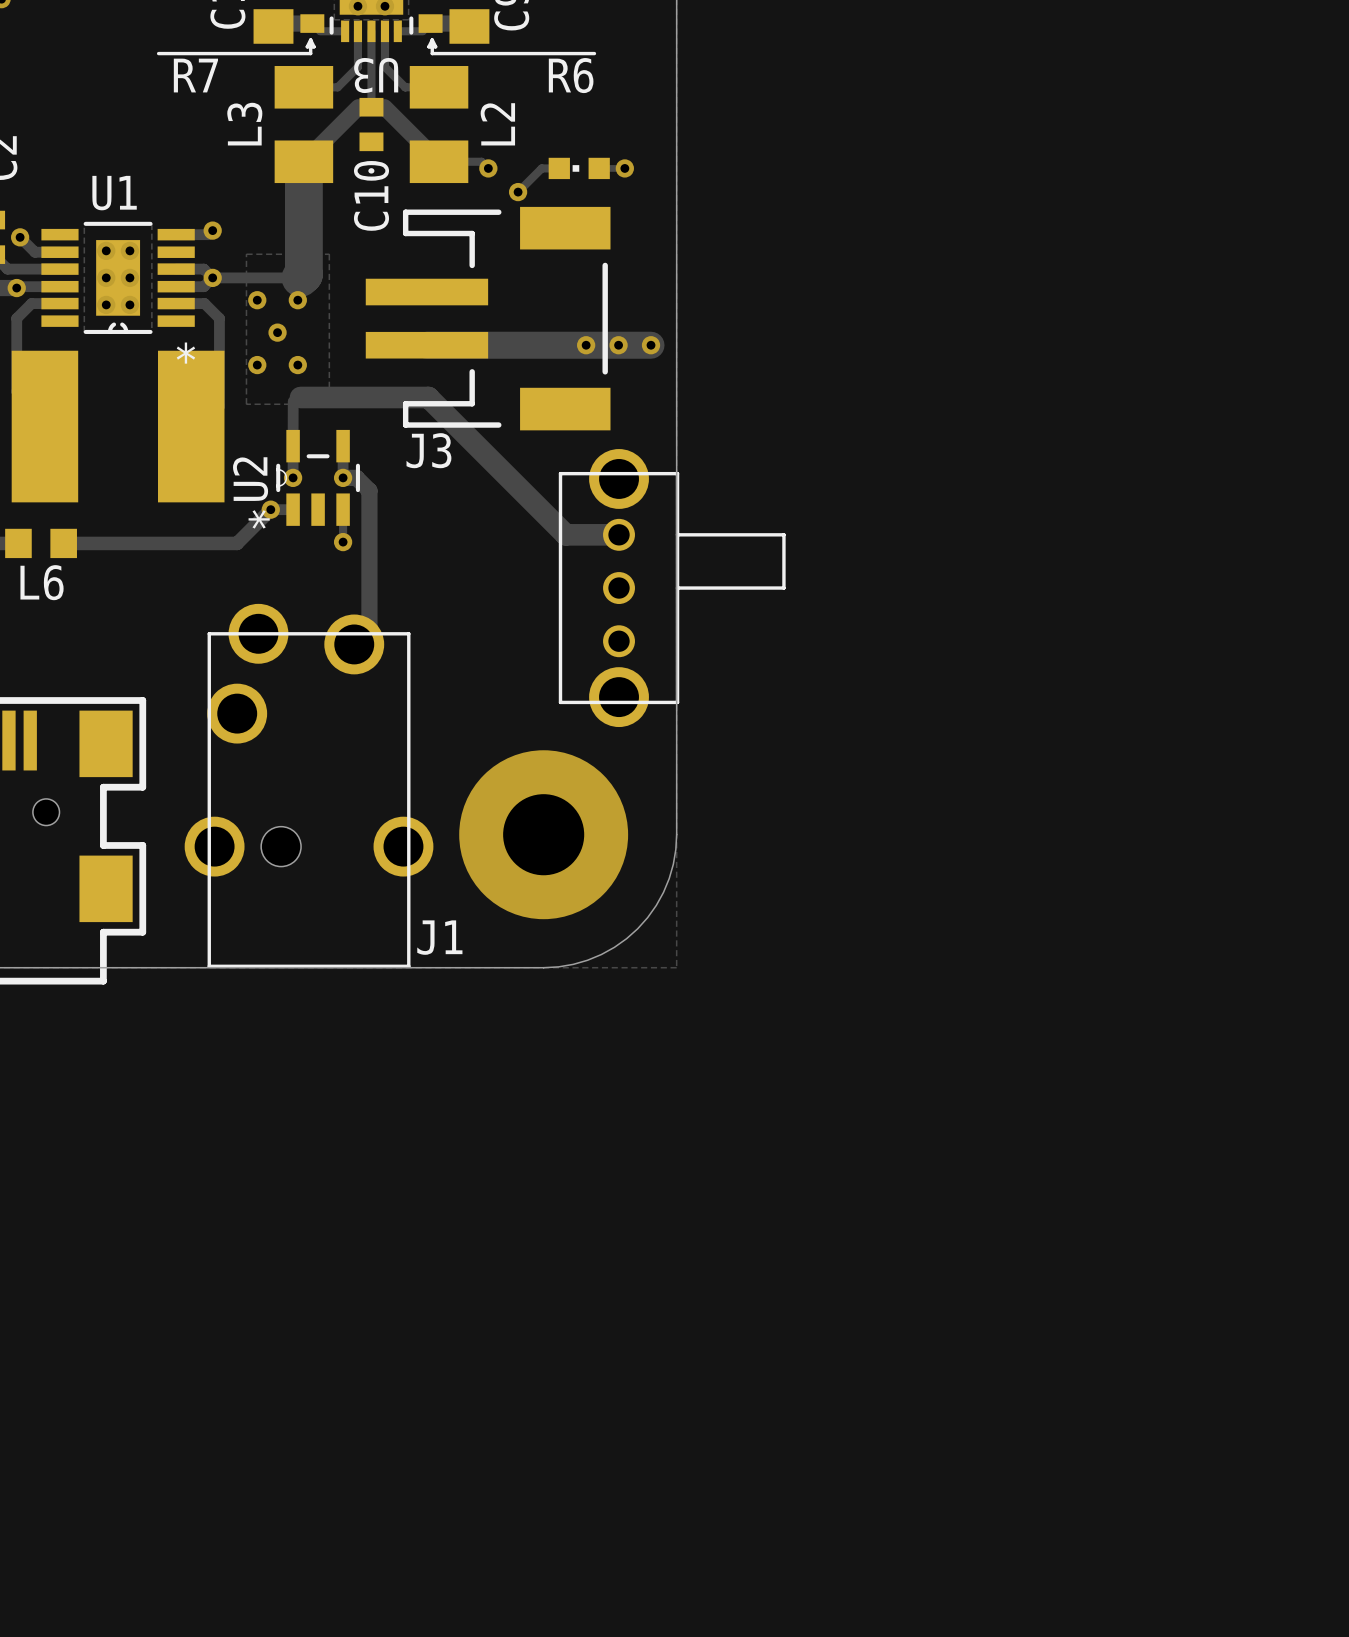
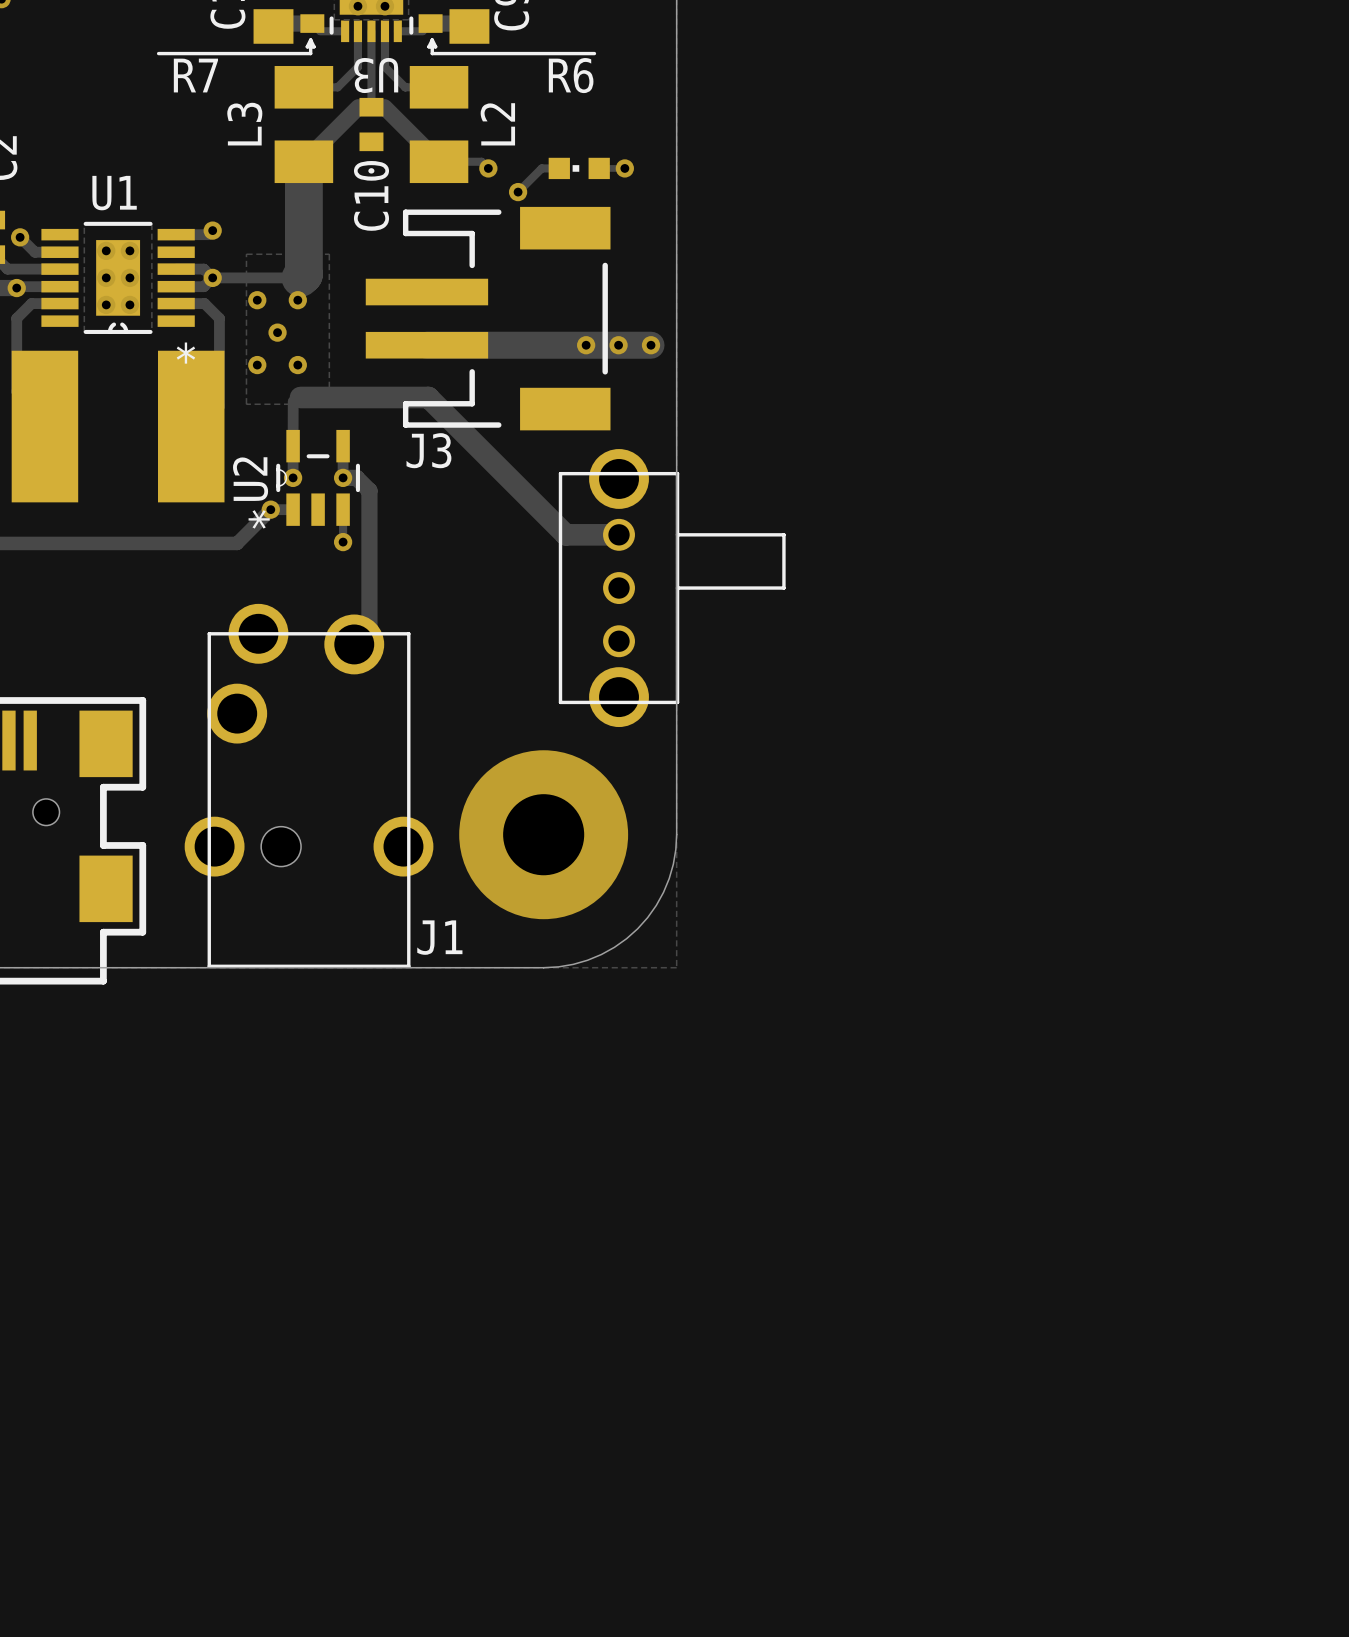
track: none -> (18, 543) (63, 543)
L6: (41, 543) -> none

